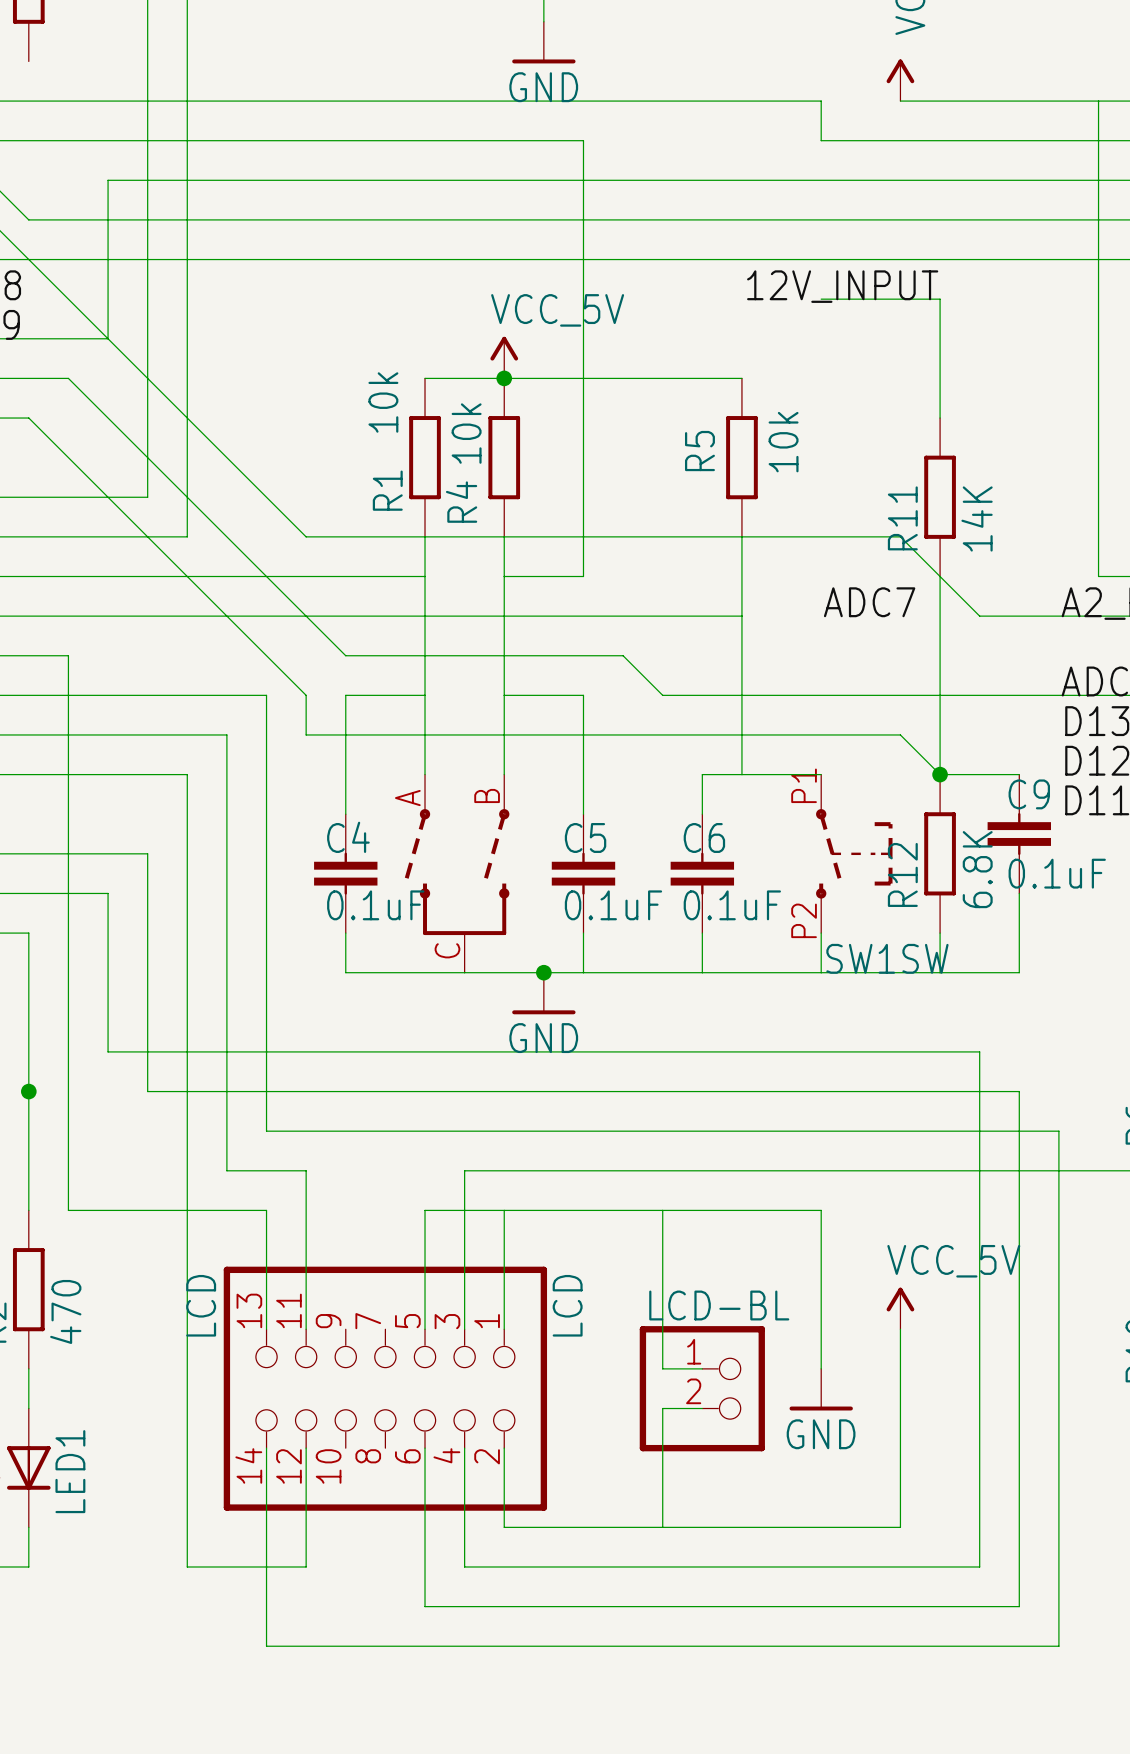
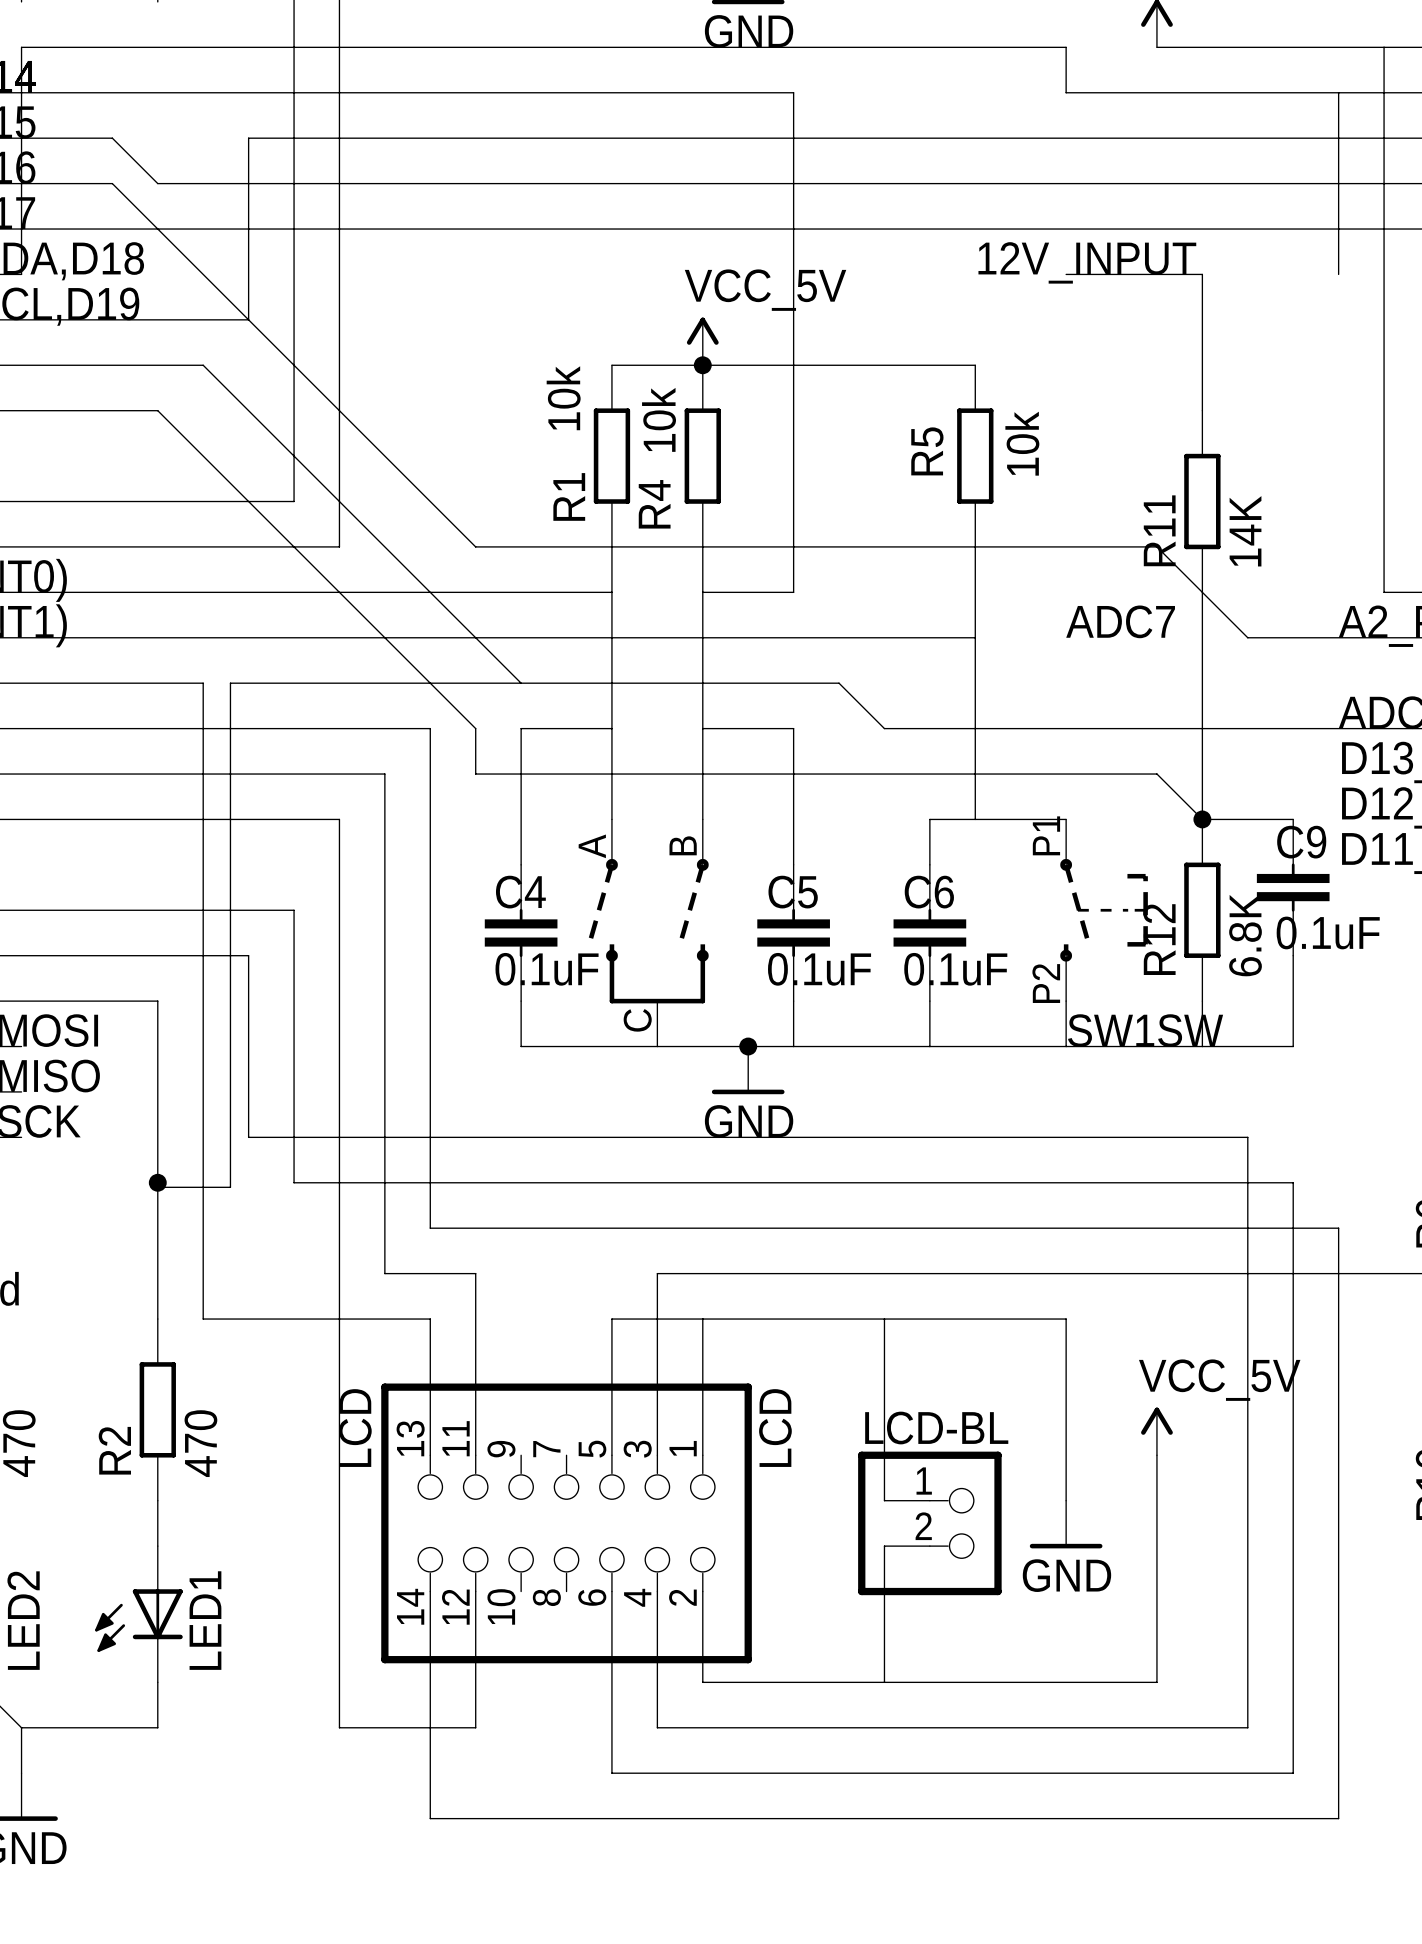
wire: none -> (1338, 92) (1338, 274)
wire: none -> (521, 683) (230, 683) (230, 1187) (157, 1187)

